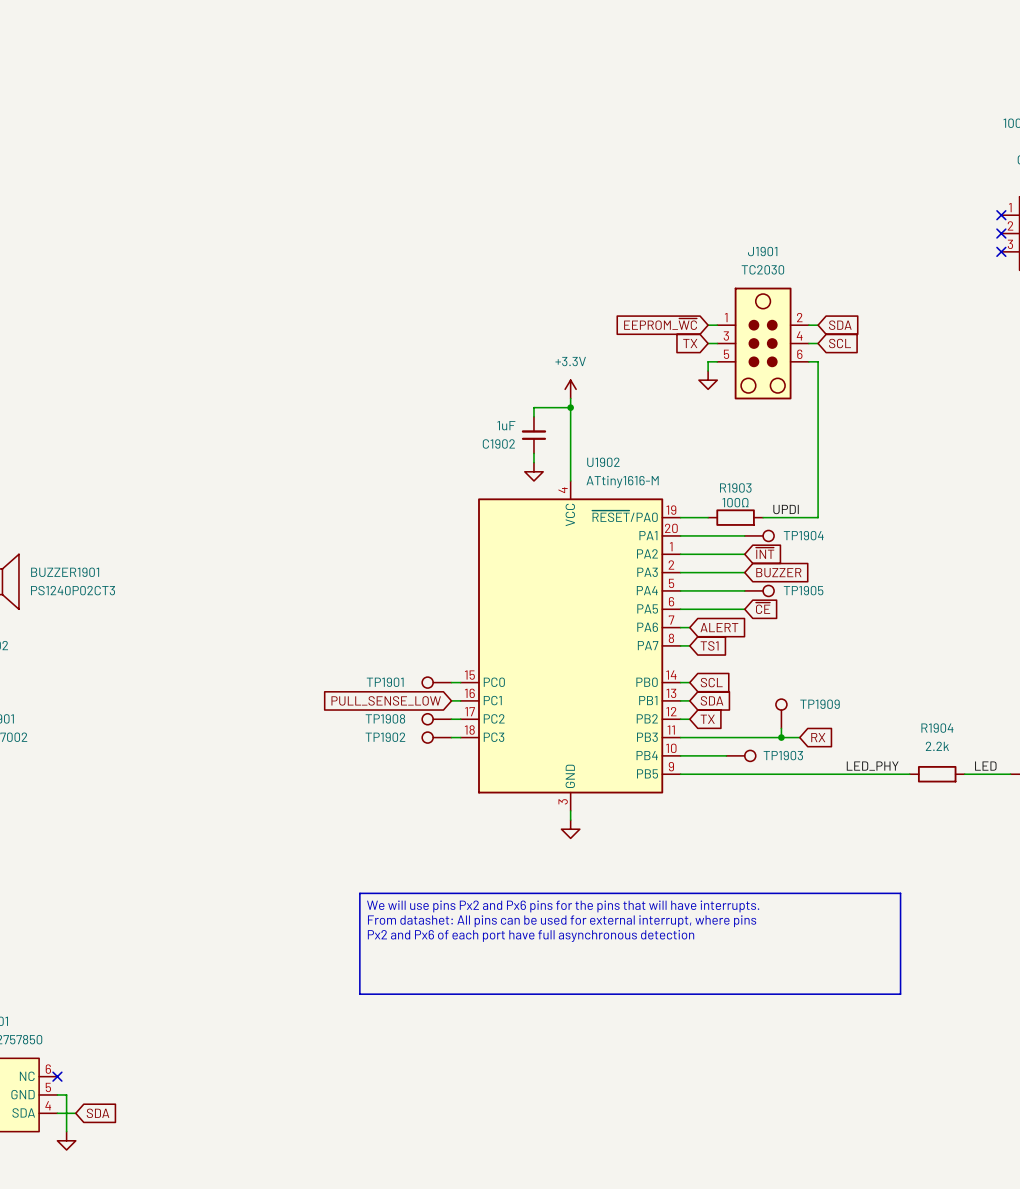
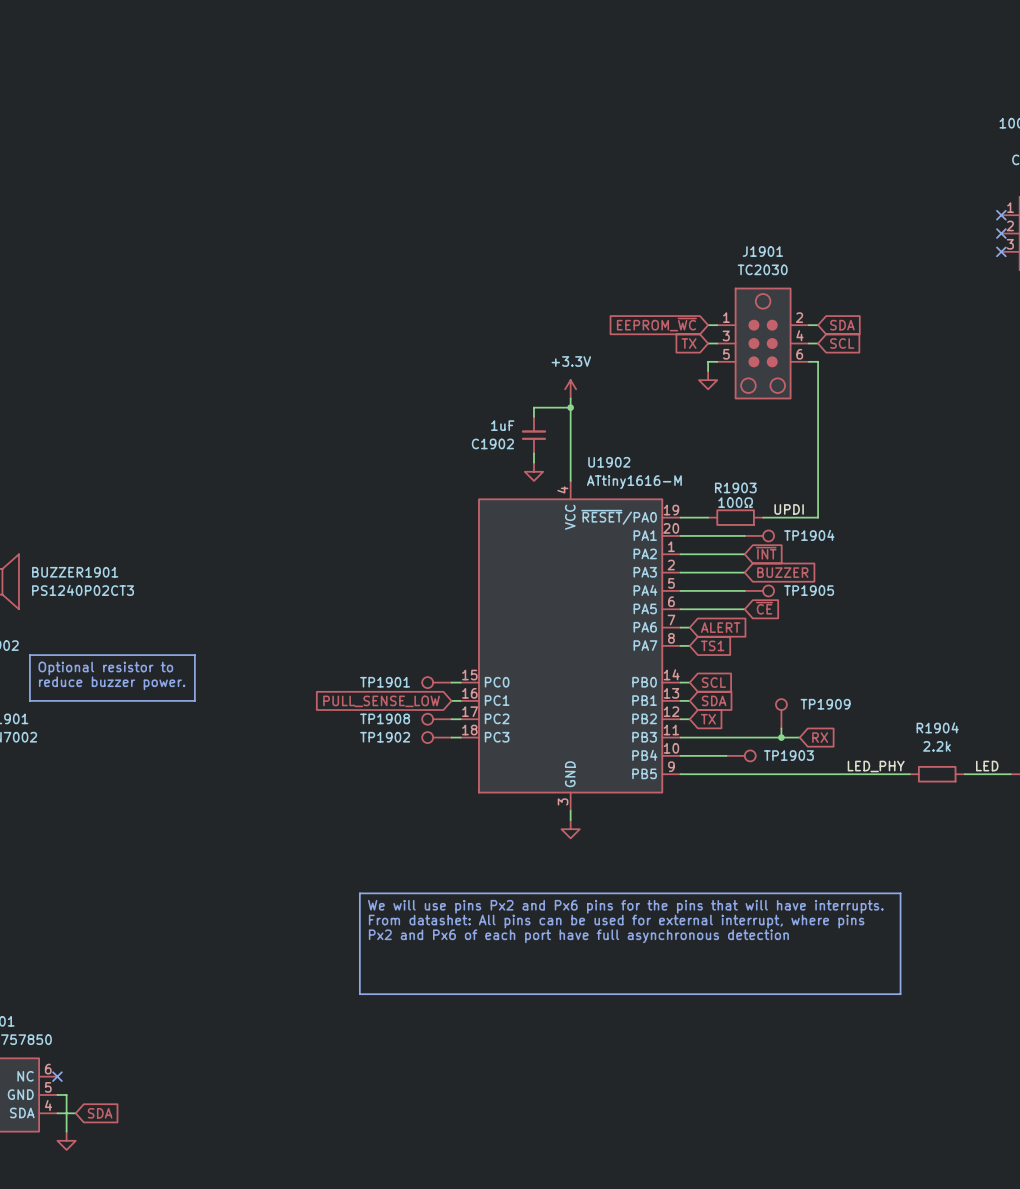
line: none -> (29, 655) (194, 655) (194, 700) (29, 700) (29, 655)
text: none -> Optional resistor to (105, 668)
text: none -> reduce buzzer power. (112, 683)

